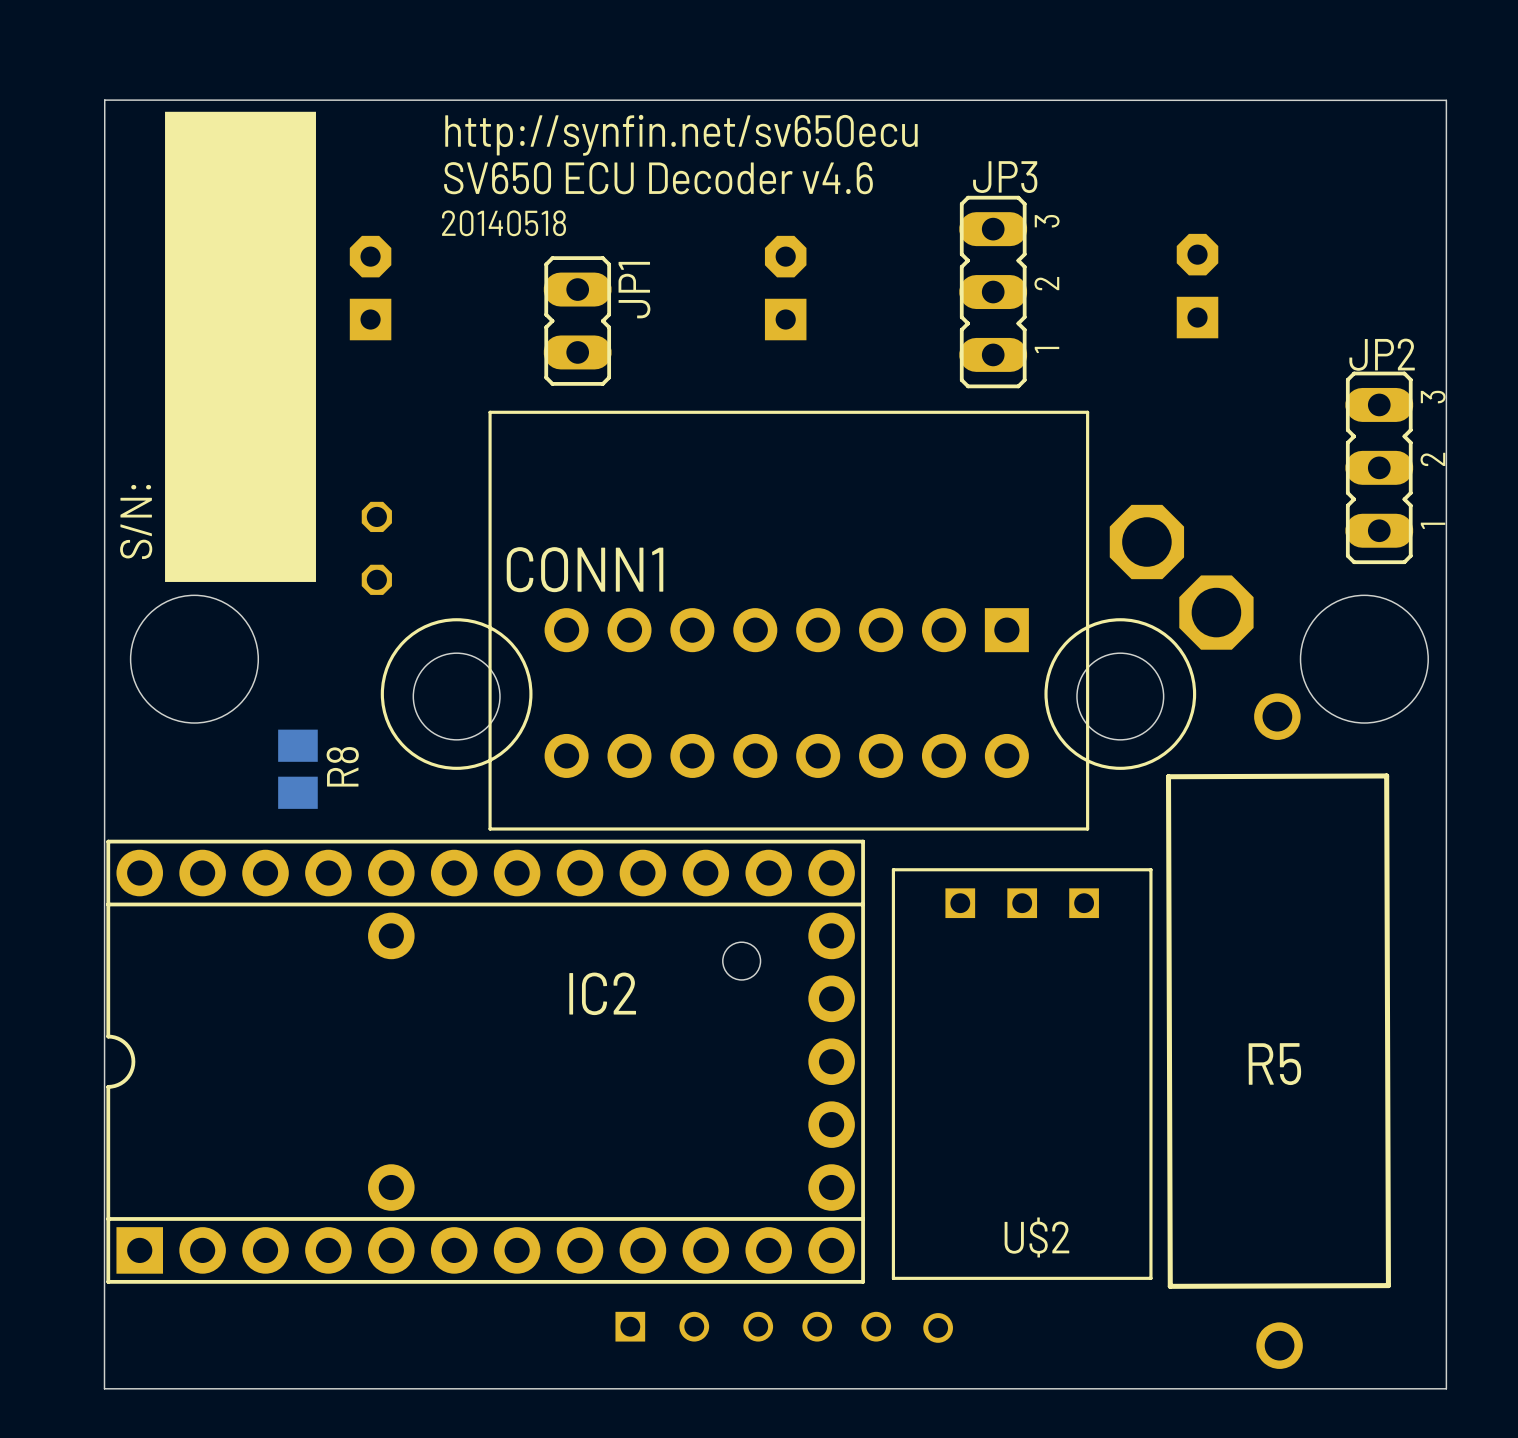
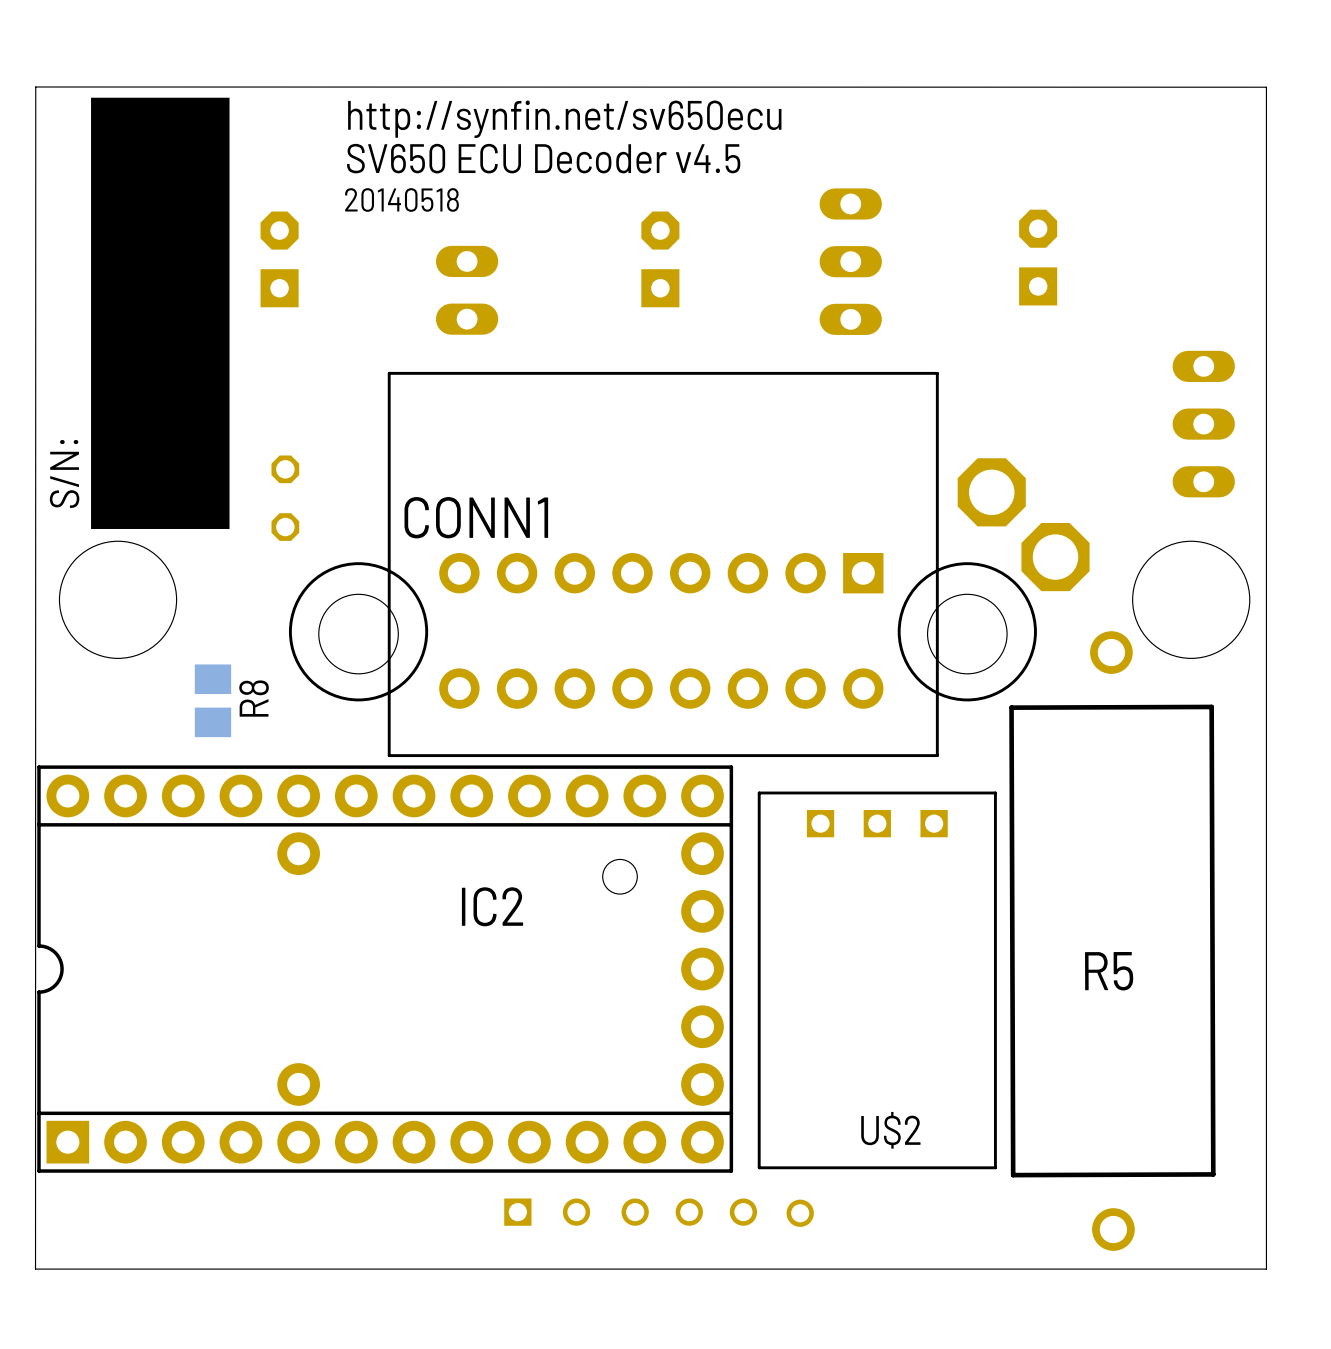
text: SV650 ECU Decoder v4.6 (658, 178) -> SV650 ECU Decoder v4.5 (543, 158)
JP3 side: bottom (993, 292) -> top (850, 261)
JP1 side: bottom (577, 321) -> top (467, 290)
JP2 side: bottom (1379, 467) -> top (1203, 424)

